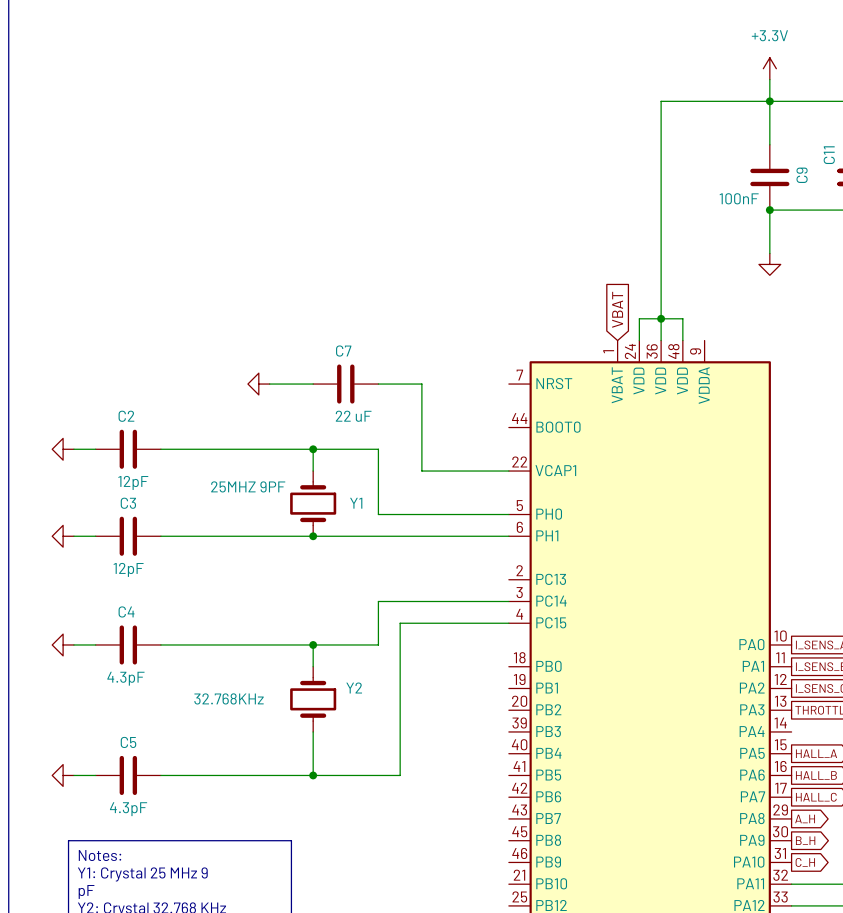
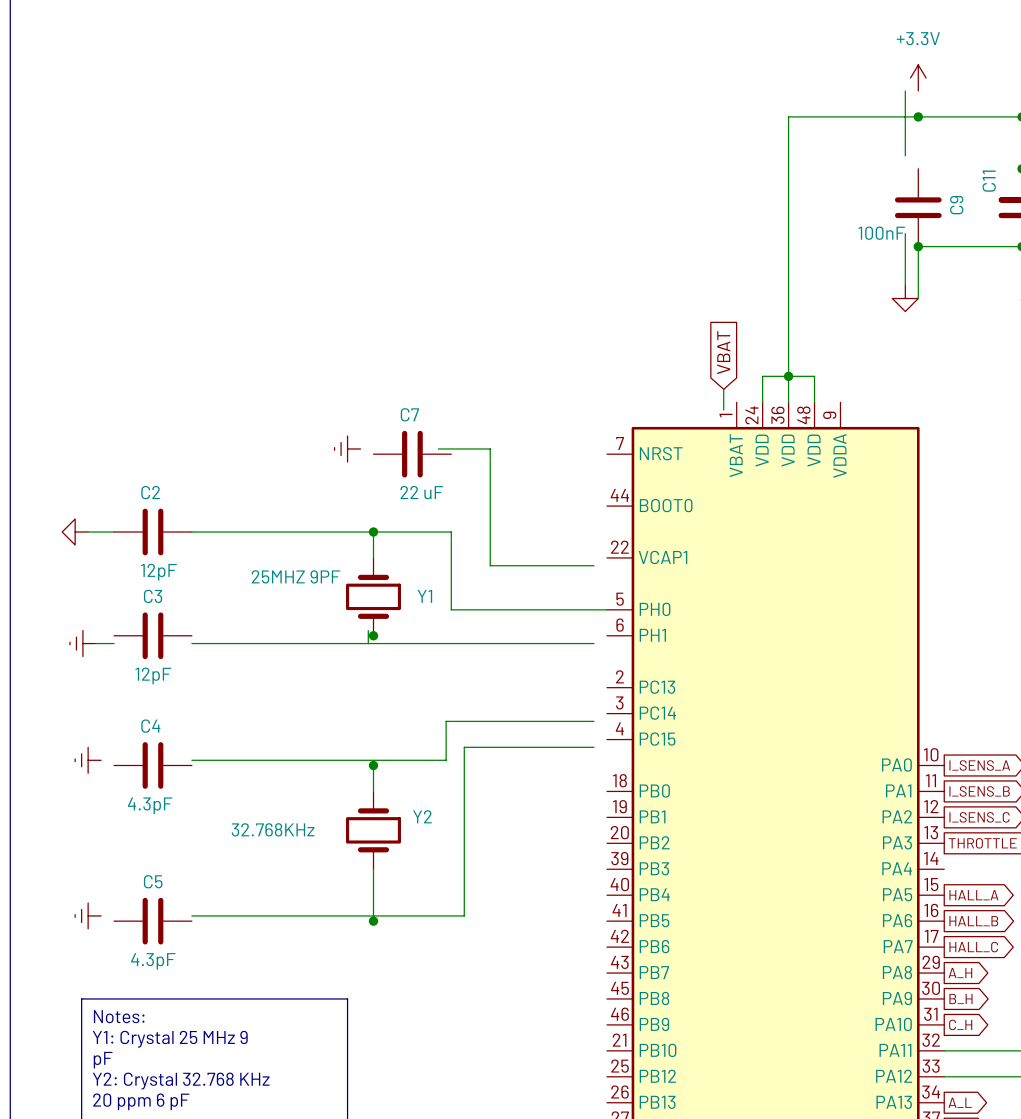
wire: none -> (905, 90) (905, 155)
wire: (769, 79) (769, 144) -> none
wire: none -> (905, 233) (905, 285)
power symbol position: (769, 264) -> (905, 298)
global label position: VBAT (617, 309) -> VBAT (723, 352)
wire: none -> (723, 389) (723, 410)
power symbol: none -> (347, 448)
wire: none -> (438, 448) (490, 448) (490, 565) (594, 565)
power symbol: (258, 384) -> none
wire: (269, 384) (313, 384) -> none
wire: (378, 384) (421, 384) (421, 471) (508, 471) -> none
wire: none -> (368, 630) (368, 643)
power symbol: (63, 536) -> none
wire: (73, 536) (95, 536) -> none
wire: (160, 536) (508, 536) -> none
power symbol: none -> (82, 643)
wire: none -> (95, 643) (114, 643)
wire: none -> (191, 643) (594, 643)
wire: (508, 601) (378, 601) (378, 644) (160, 644) -> none
wire: none -> (594, 721) (446, 721) (446, 760) (191, 760)
wire: (508, 623) (400, 623) (400, 775) (160, 775) -> none
wire: none -> (594, 747) (464, 747) (464, 915) (191, 915)
power symbol: none -> (88, 760)
power symbol: (63, 644) -> none
wire: (73, 644) (95, 644) -> none
power symbol: none -> (88, 915)
power symbol: (63, 775) -> none
wire: (73, 775) (95, 775) -> none

